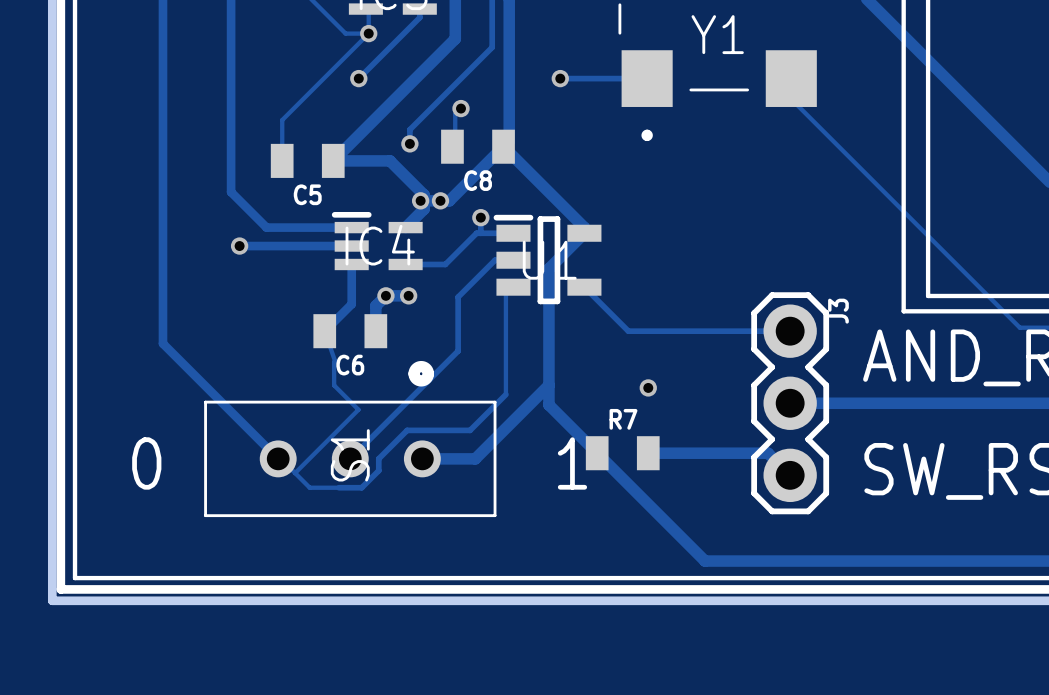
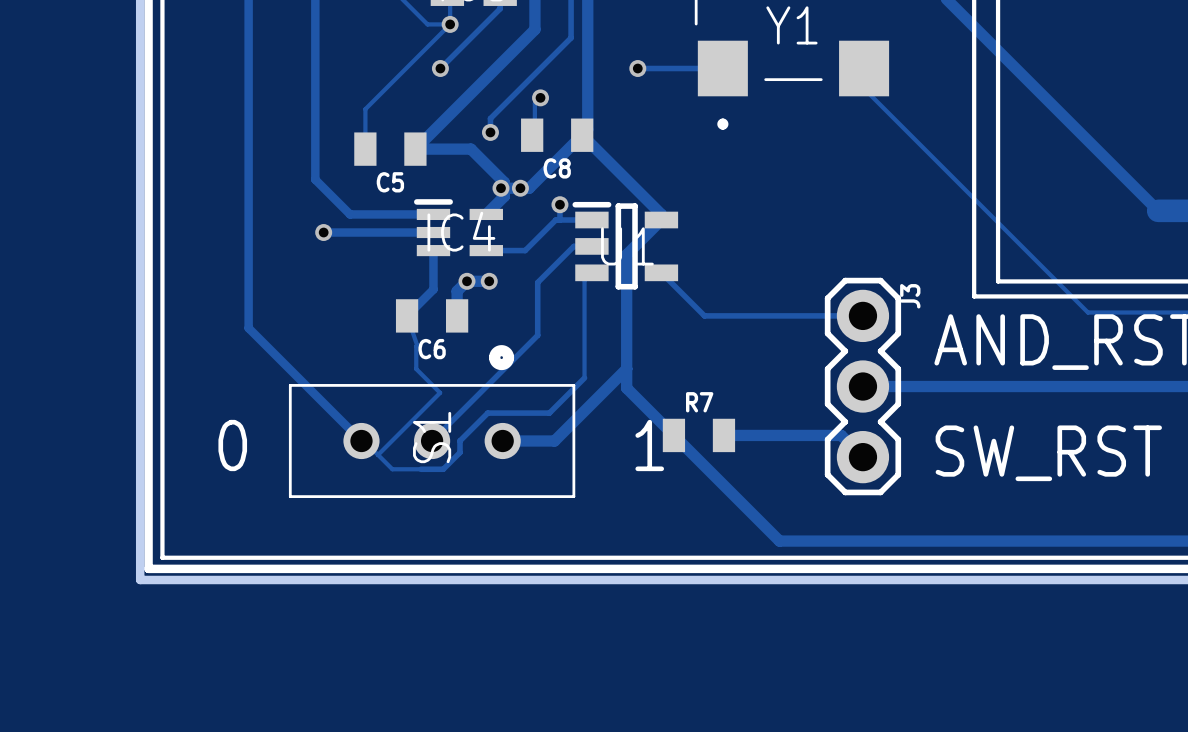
via: (648, 387) -> none

